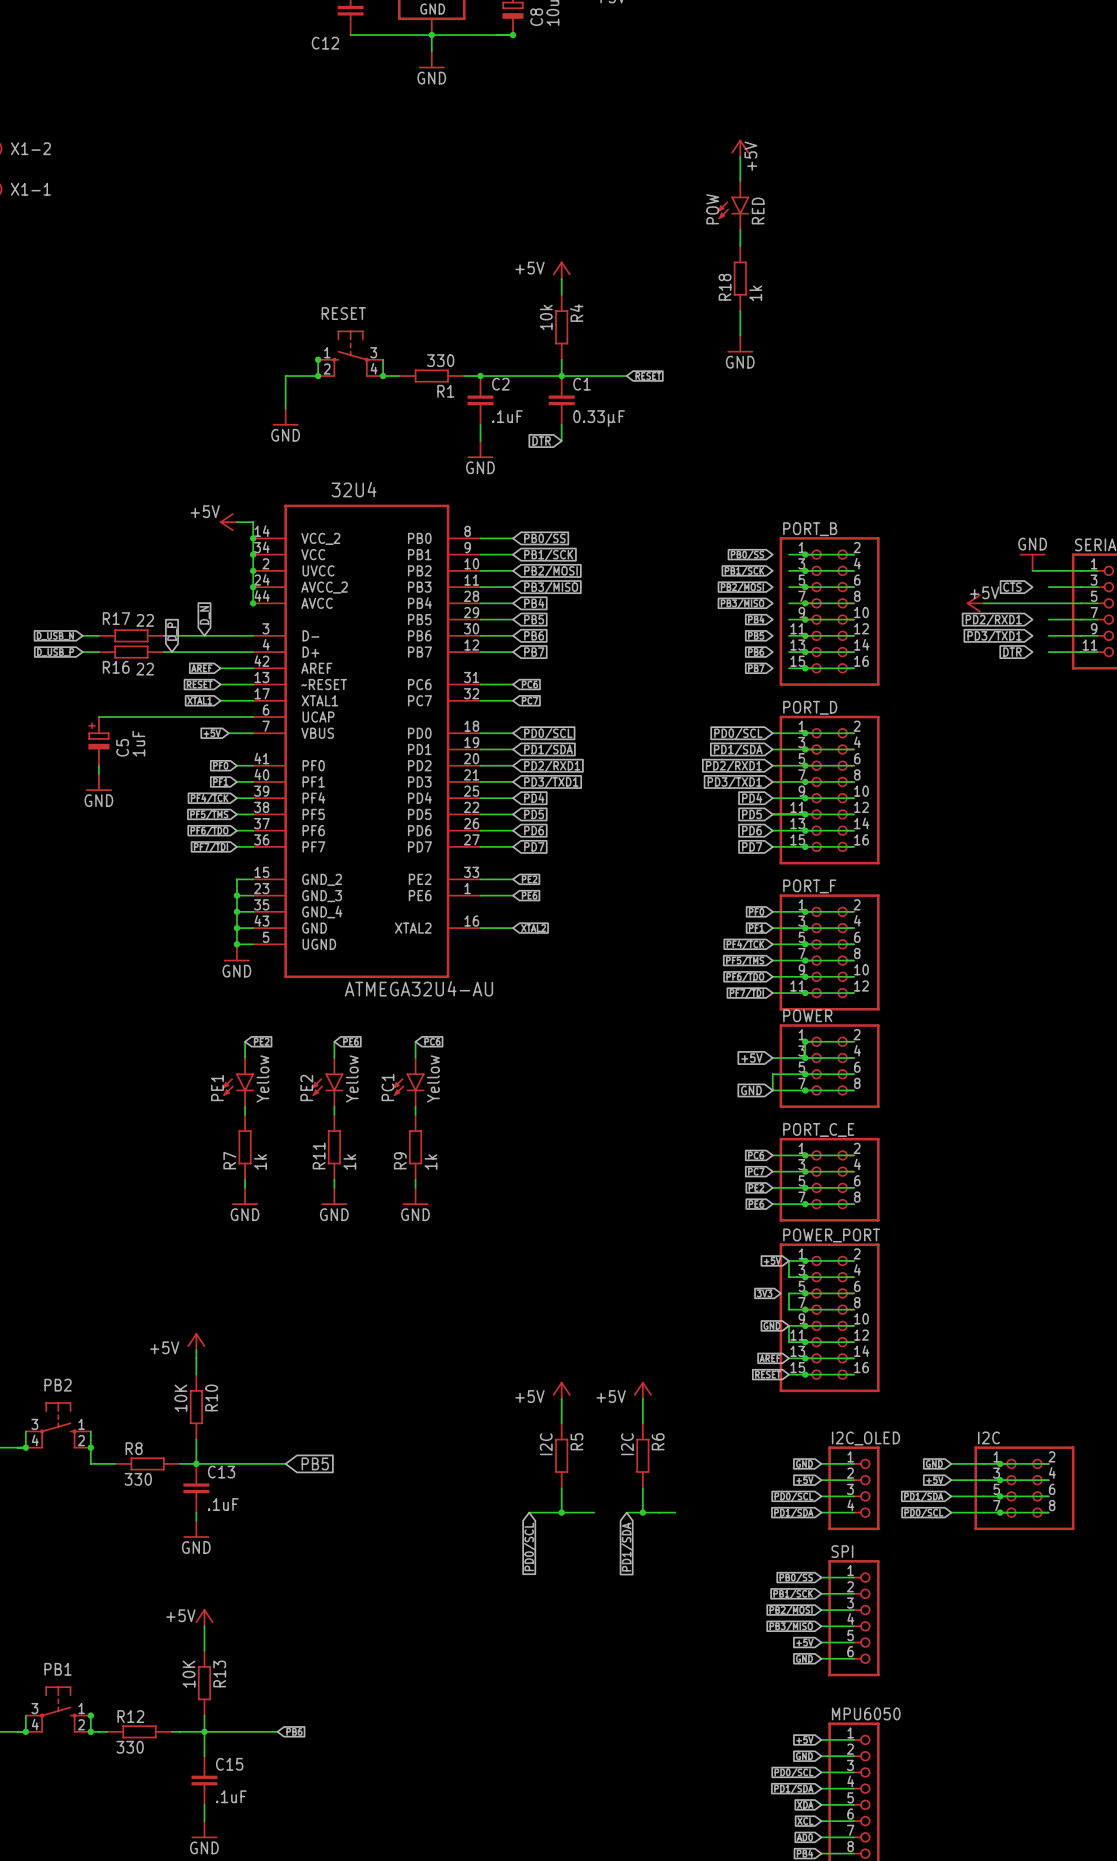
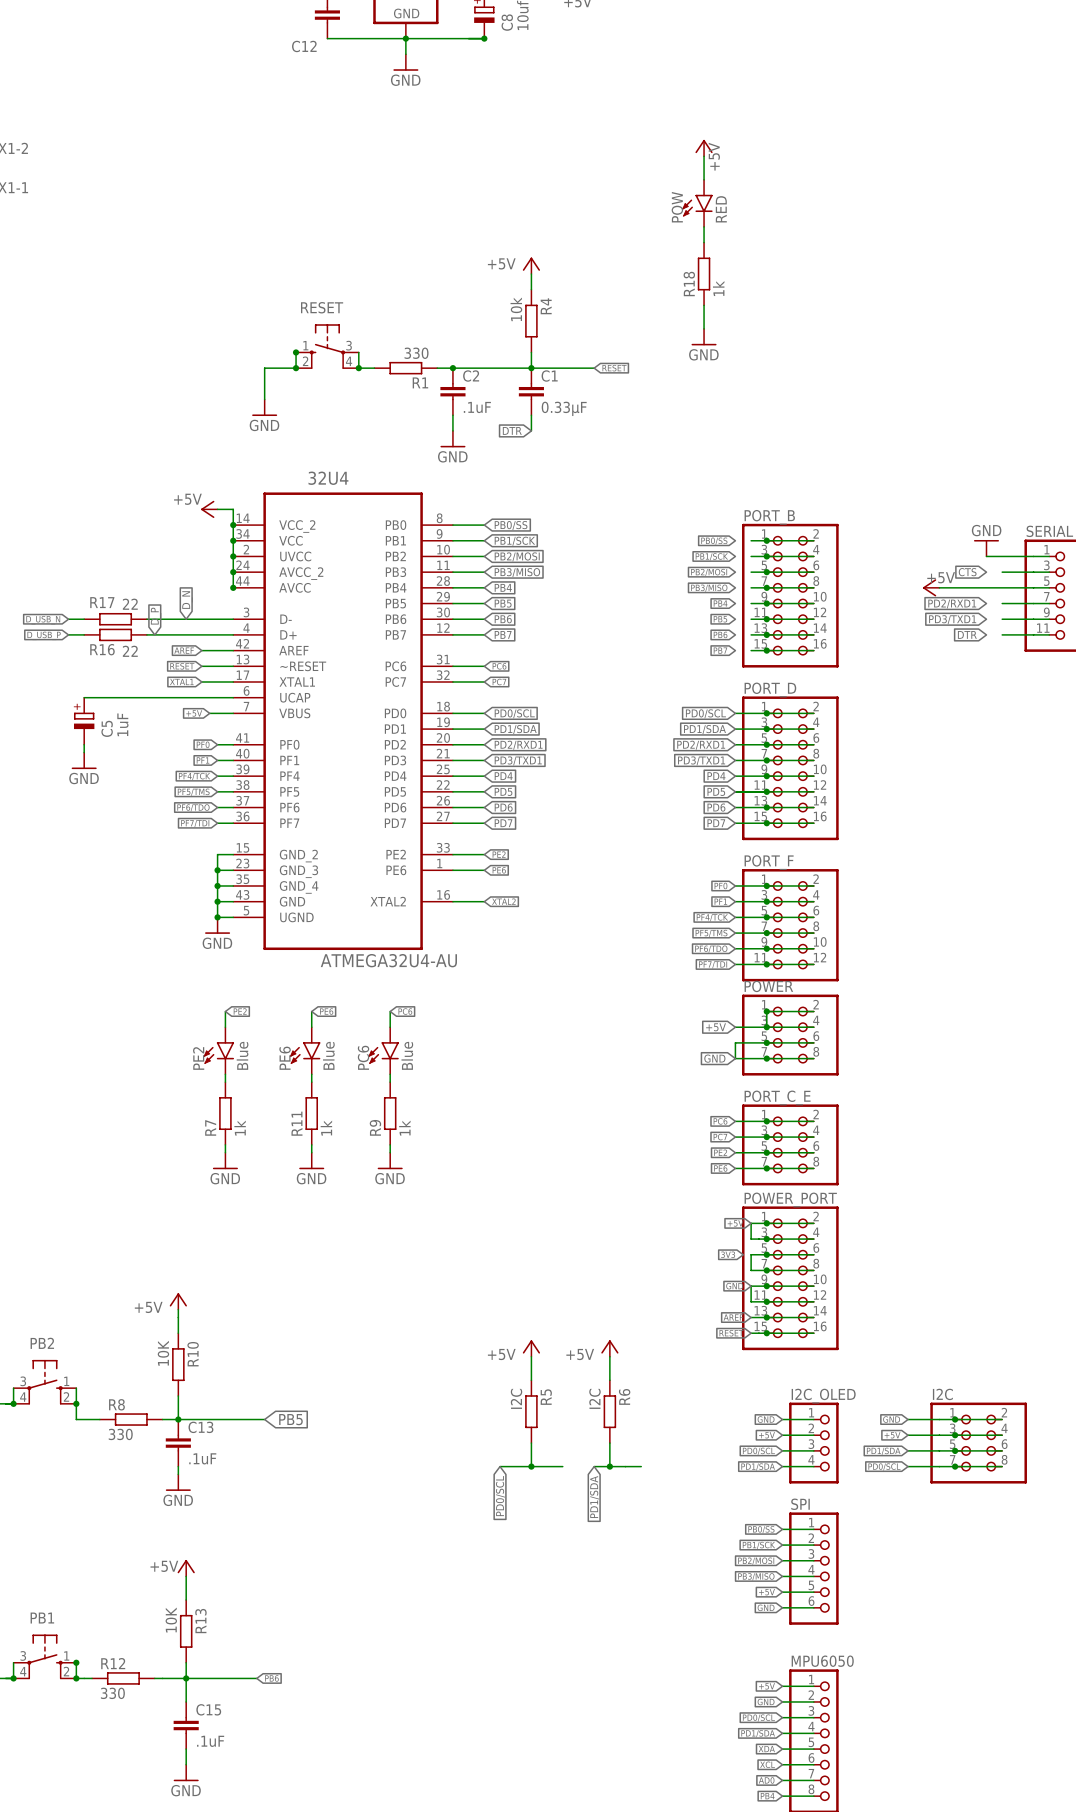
PE1 value: Yellow (262, 1078) -> Blue (242, 1055)
PE2 value: Yellow (352, 1078) -> Blue (328, 1055)
PC1 value: Yellow (433, 1078) -> Blue (407, 1055)
PC1 name: PC1 (387, 1087) -> PC6 (363, 1057)
PE1 name: PE1 (217, 1088) -> PE2 (198, 1058)
PE2 name: PE2 (306, 1088) -> PE6 (285, 1058)

